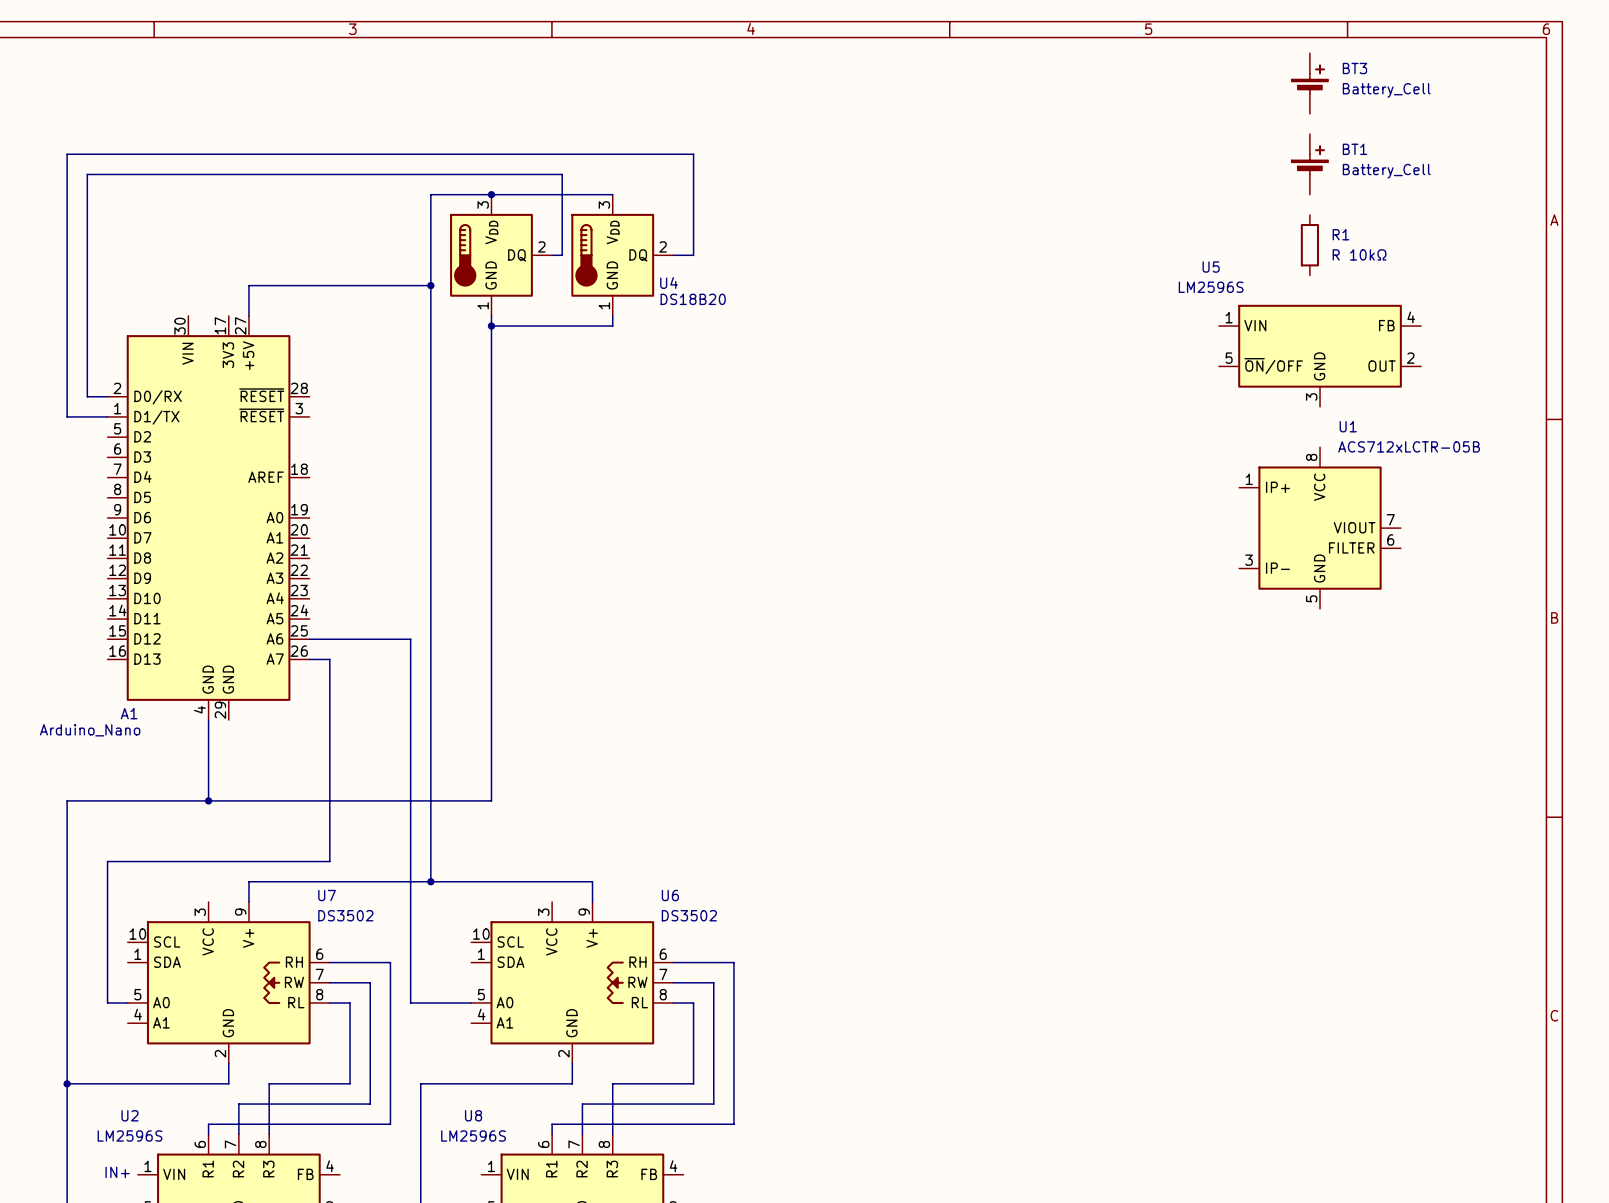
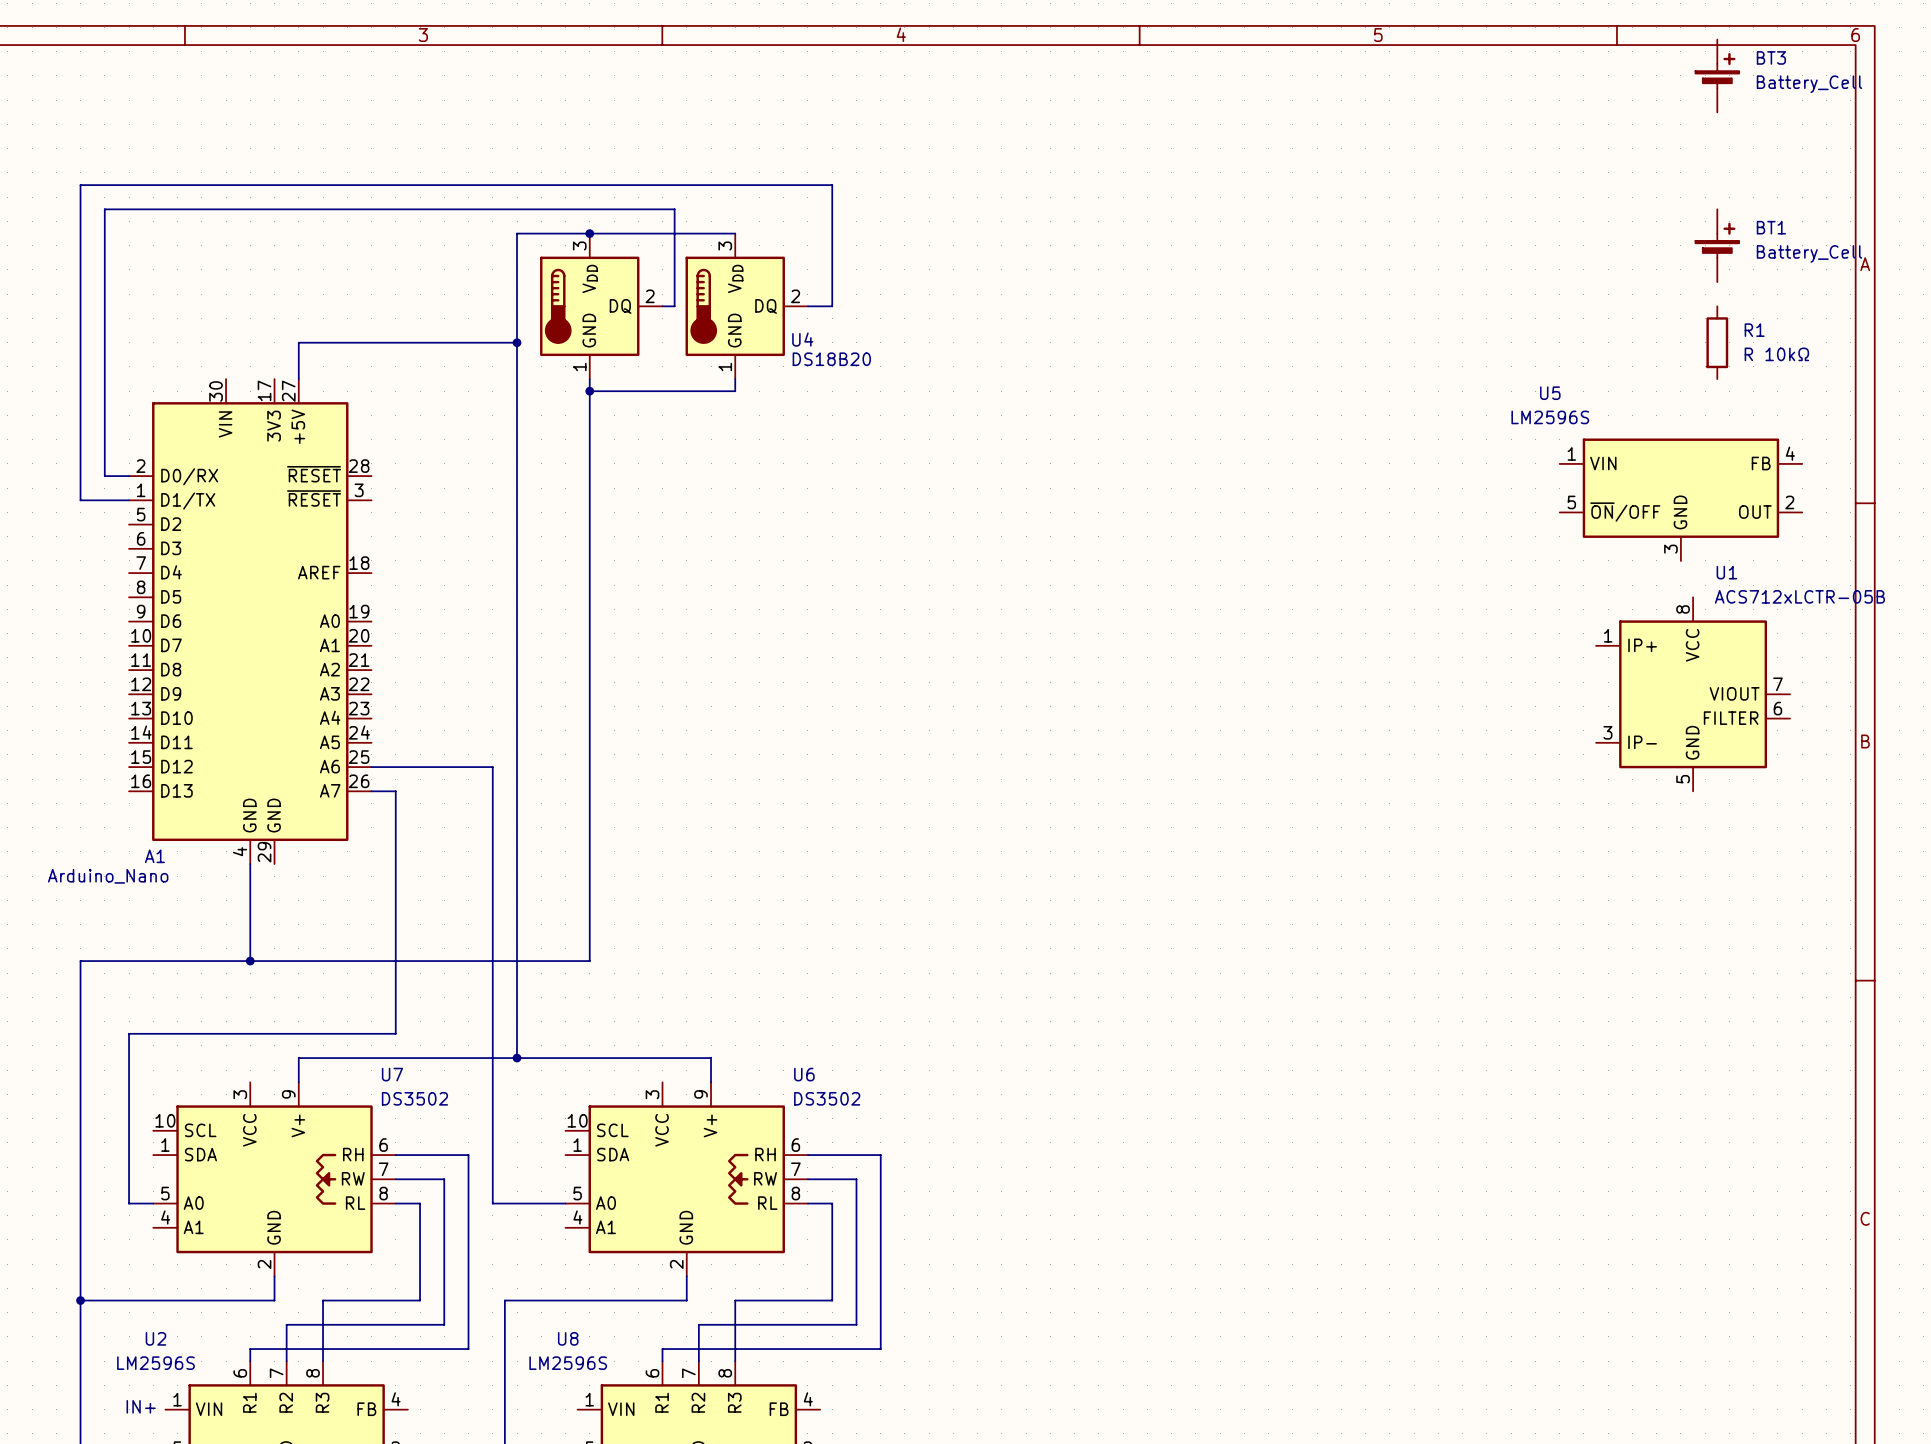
BT3 position: (1309, 83) -> (1717, 75)
BT1 position: (1309, 164) -> (1717, 245)
R1 position: (1309, 245) -> (1717, 342)
U5 position: (1320, 355) -> (1680, 499)
U1 position: (1320, 528) -> (1693, 694)

